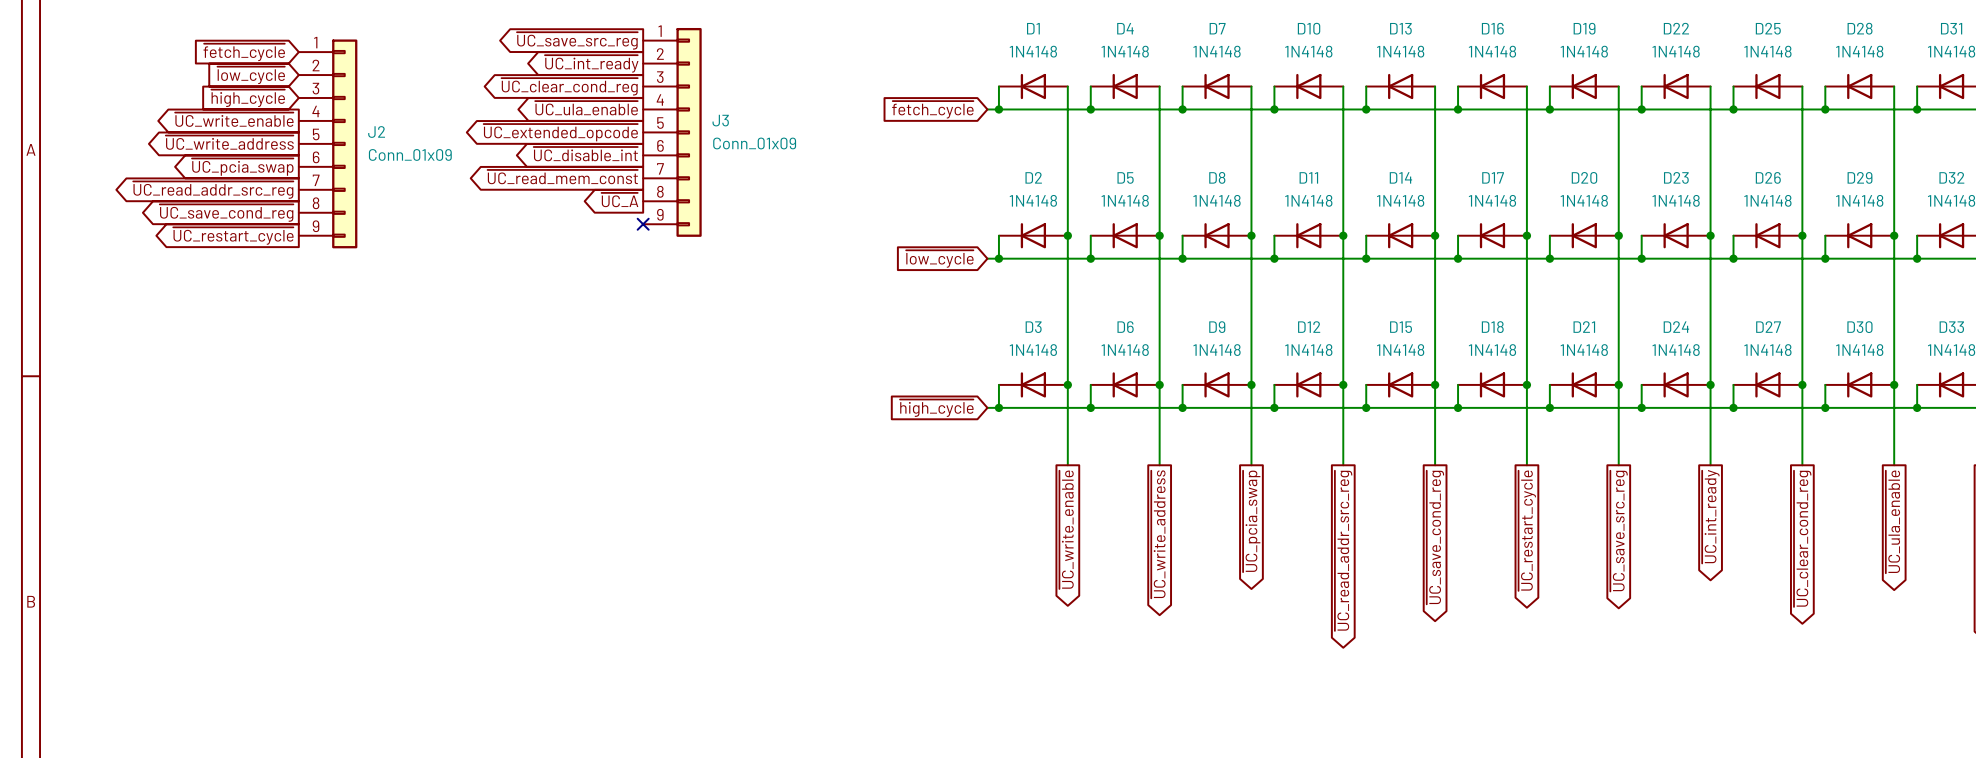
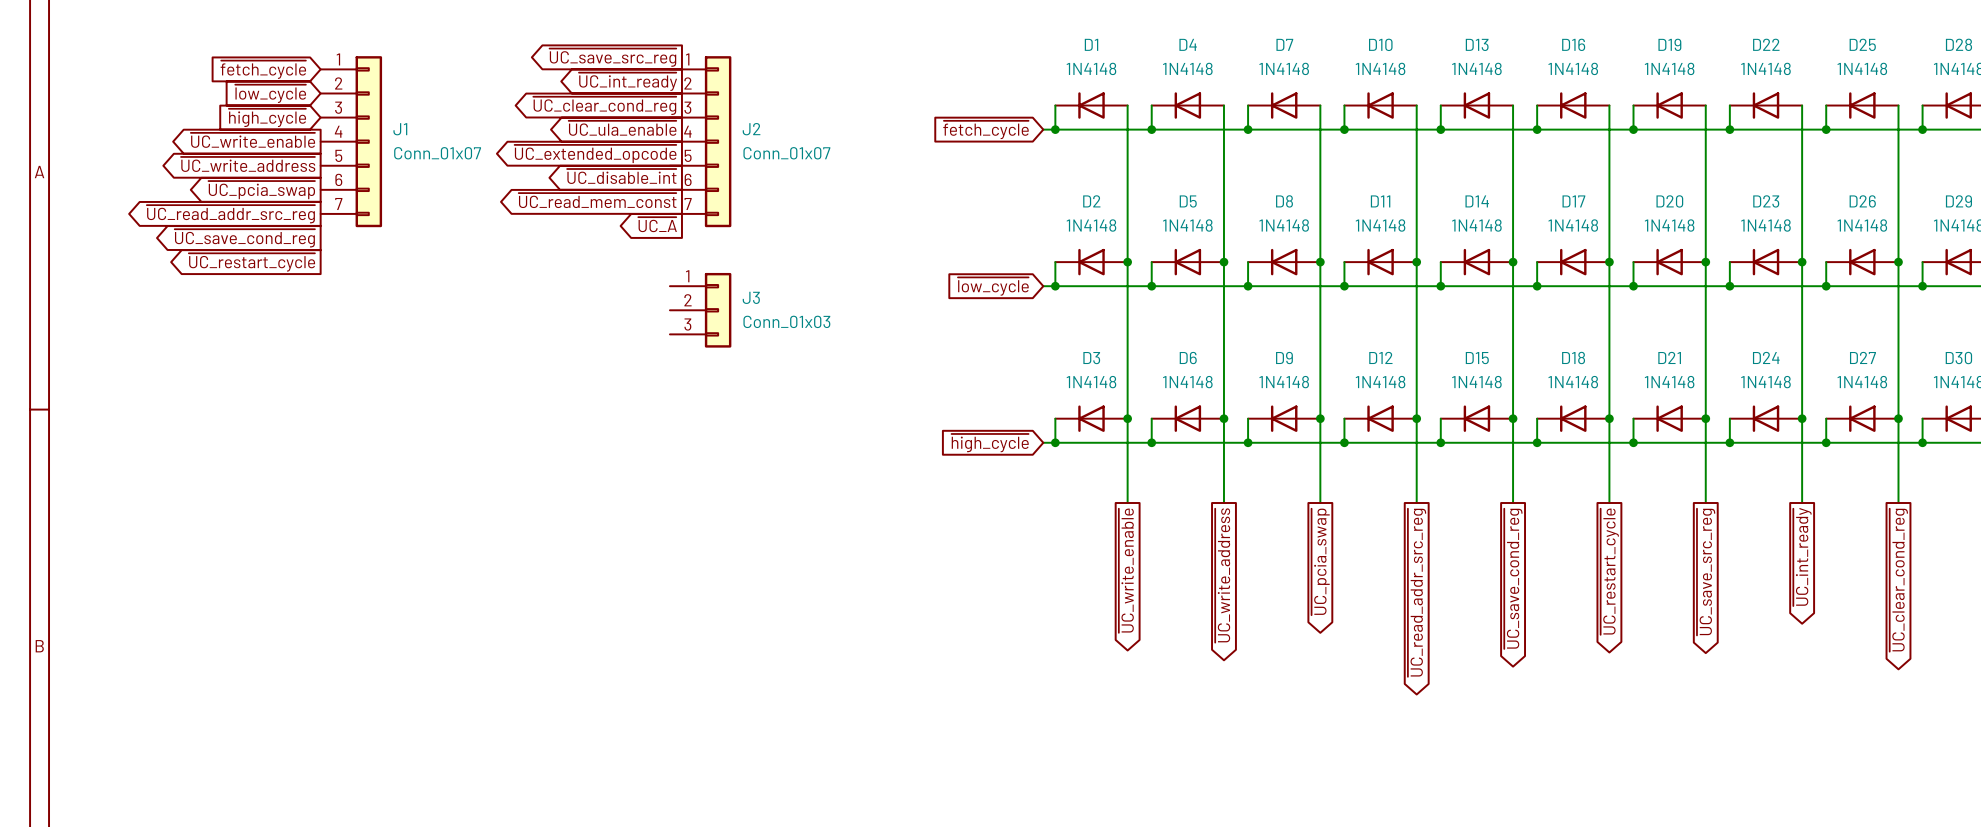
J3 symbol: [643, 27, 702, 237] -> [669, 272, 732, 348]
J2 symbol: [298, 39, 358, 249] -> [669, 56, 732, 228]
J1: none -> Conn_01x07 (351, 141)
J3 value: Conn_01x09 (754, 143) -> Conn_01x03 (786, 321)
J2 value: Conn_01x09 (410, 154) -> Conn_01x07 (786, 153)
no-connect mark: (643, 224) -> none

